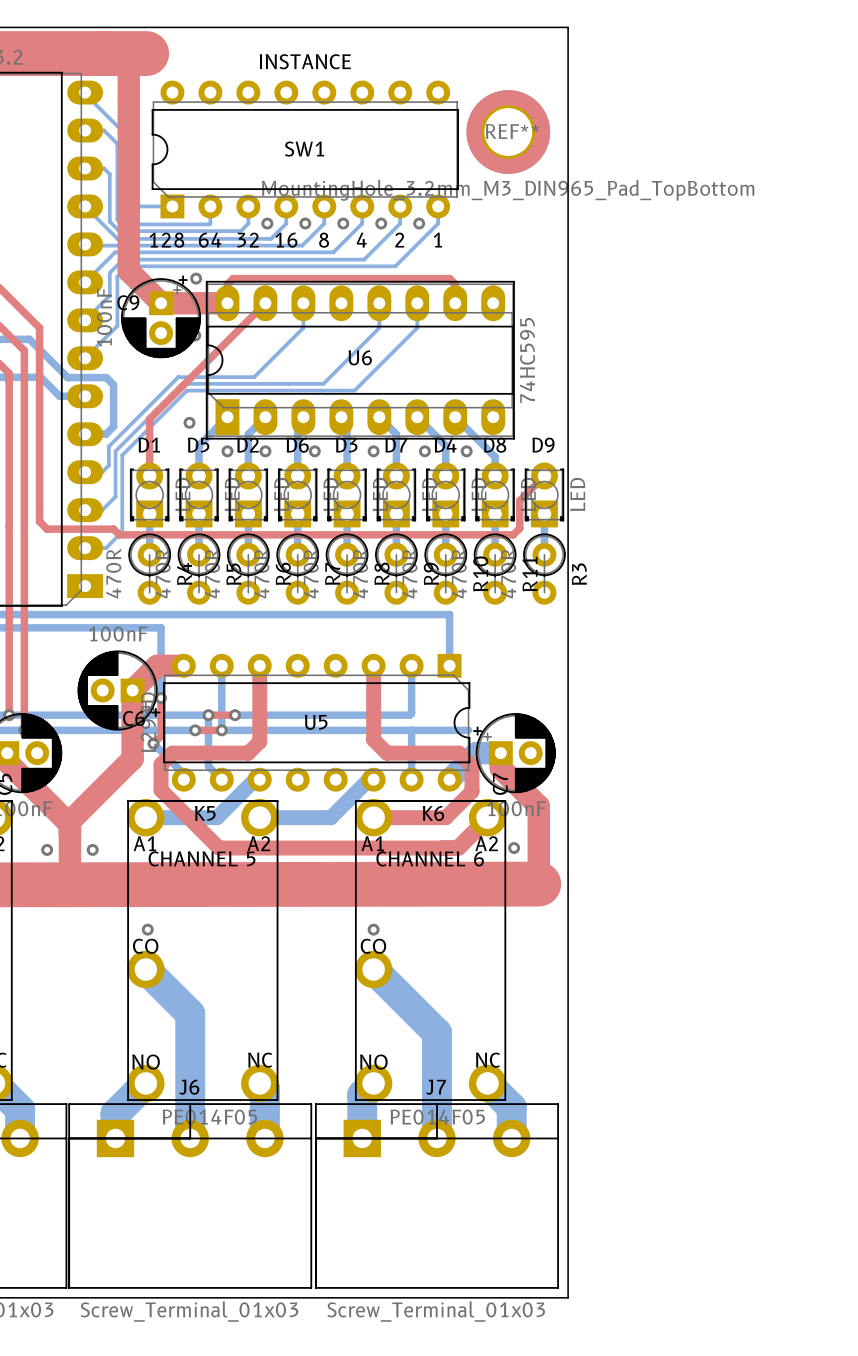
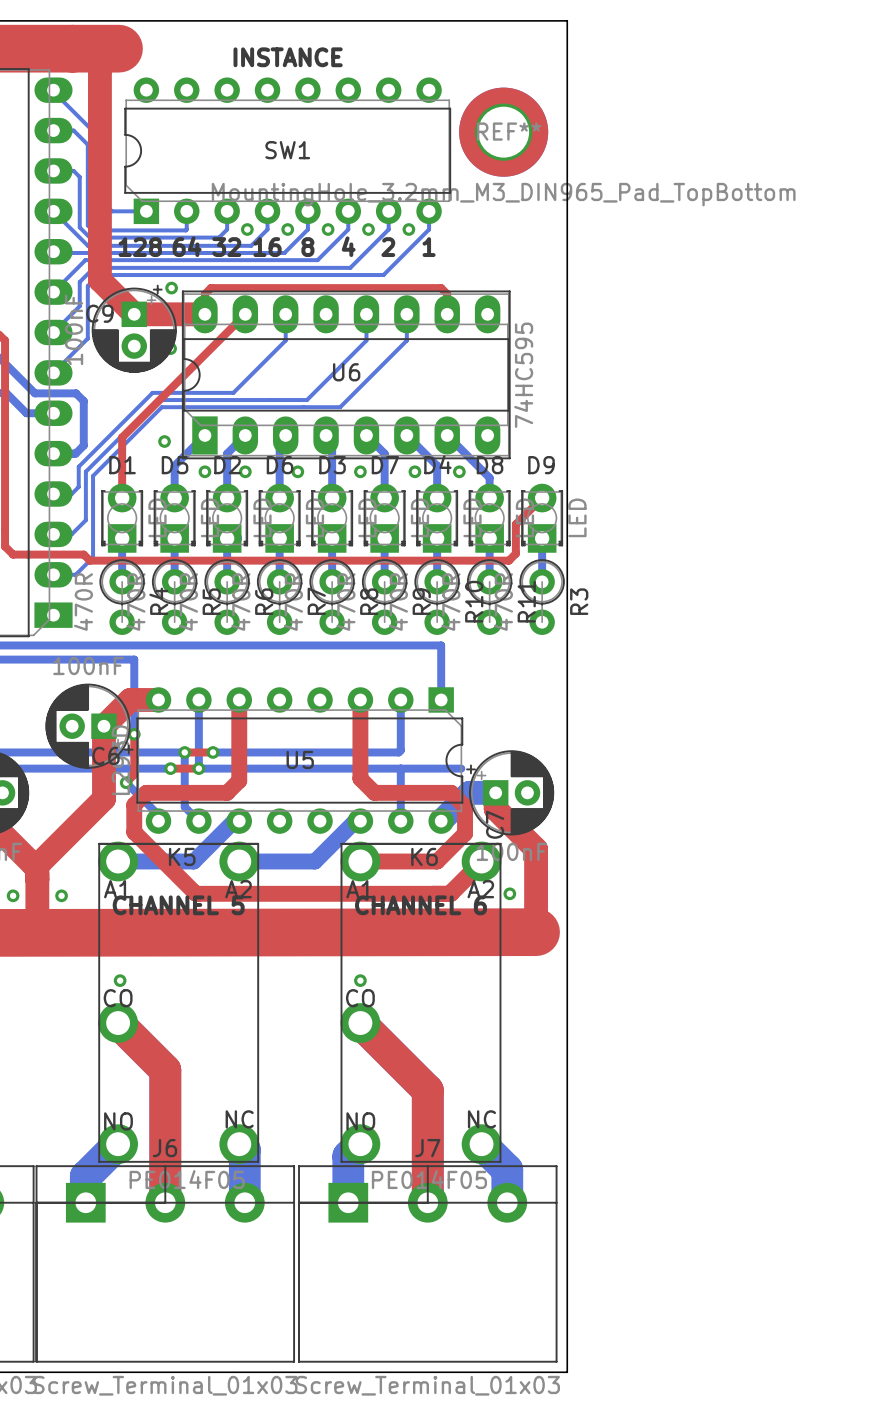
top track: none -> (118, 1023) (165, 1070) (165, 1202)
top track: none -> (360, 1023) (427, 1090) (427, 1202)

